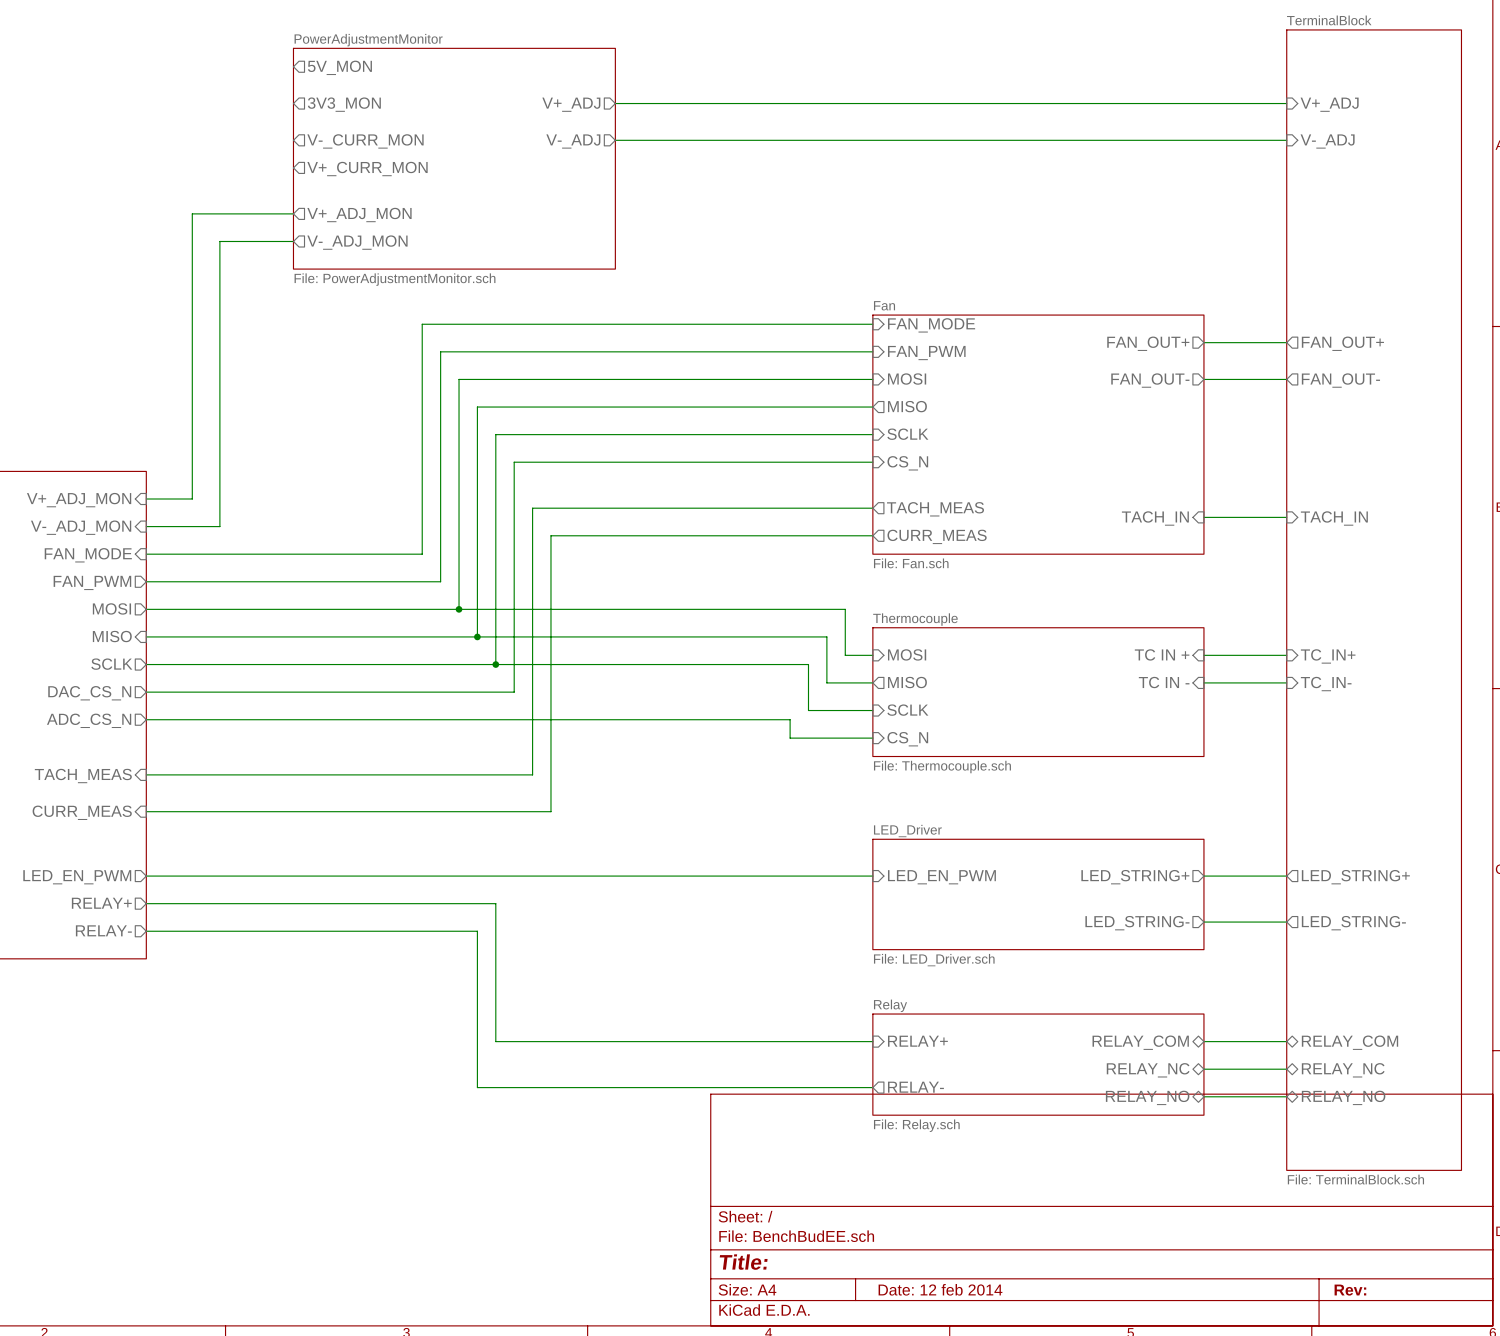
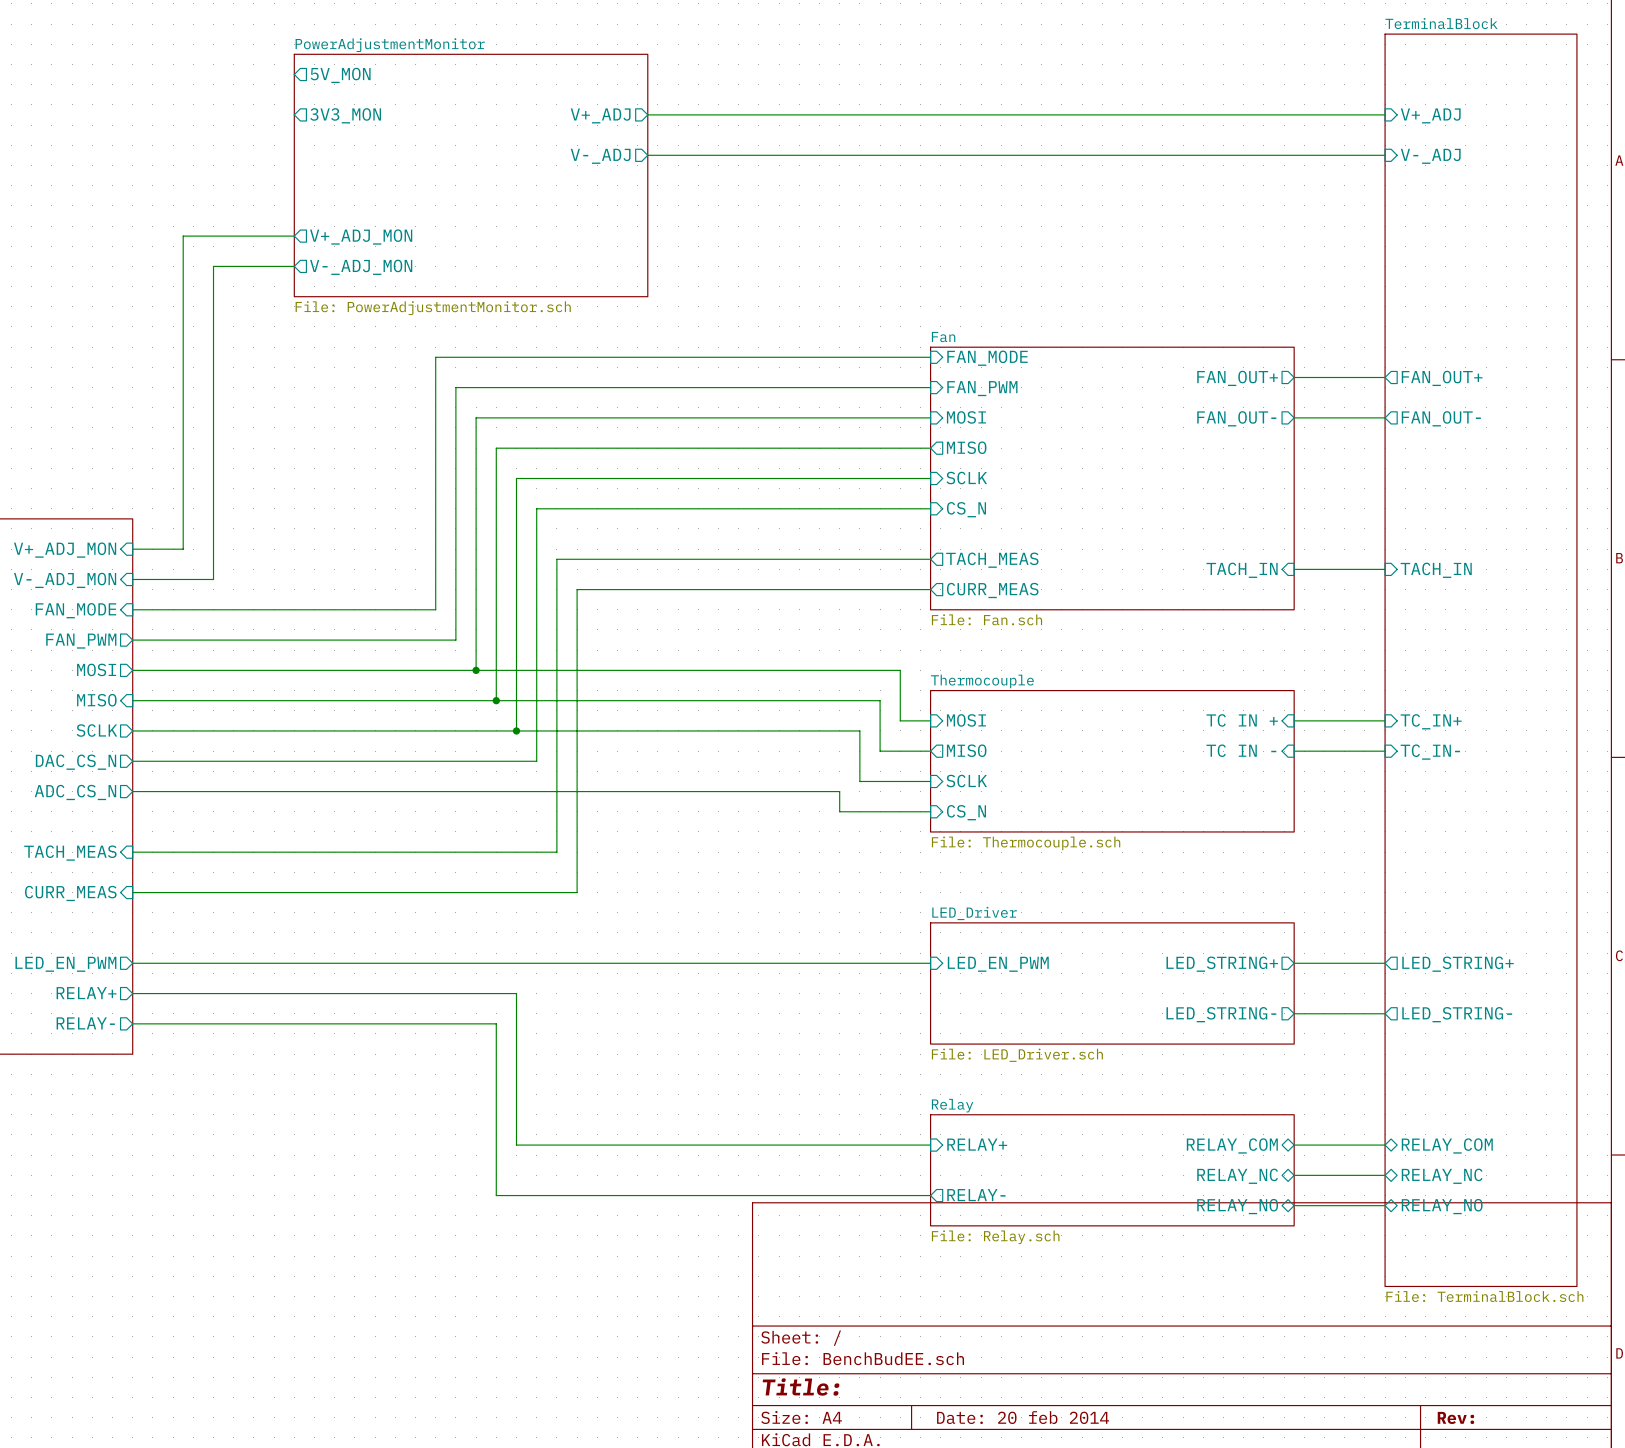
sheet pin: V-_CURR_MON (365, 141) -> none
sheet pin: V+_CURR_MON (367, 169) -> none
title block: Date: 12 feb 2014 (940, 1289) -> Date: 20 feb 2014 (1023, 1417)

